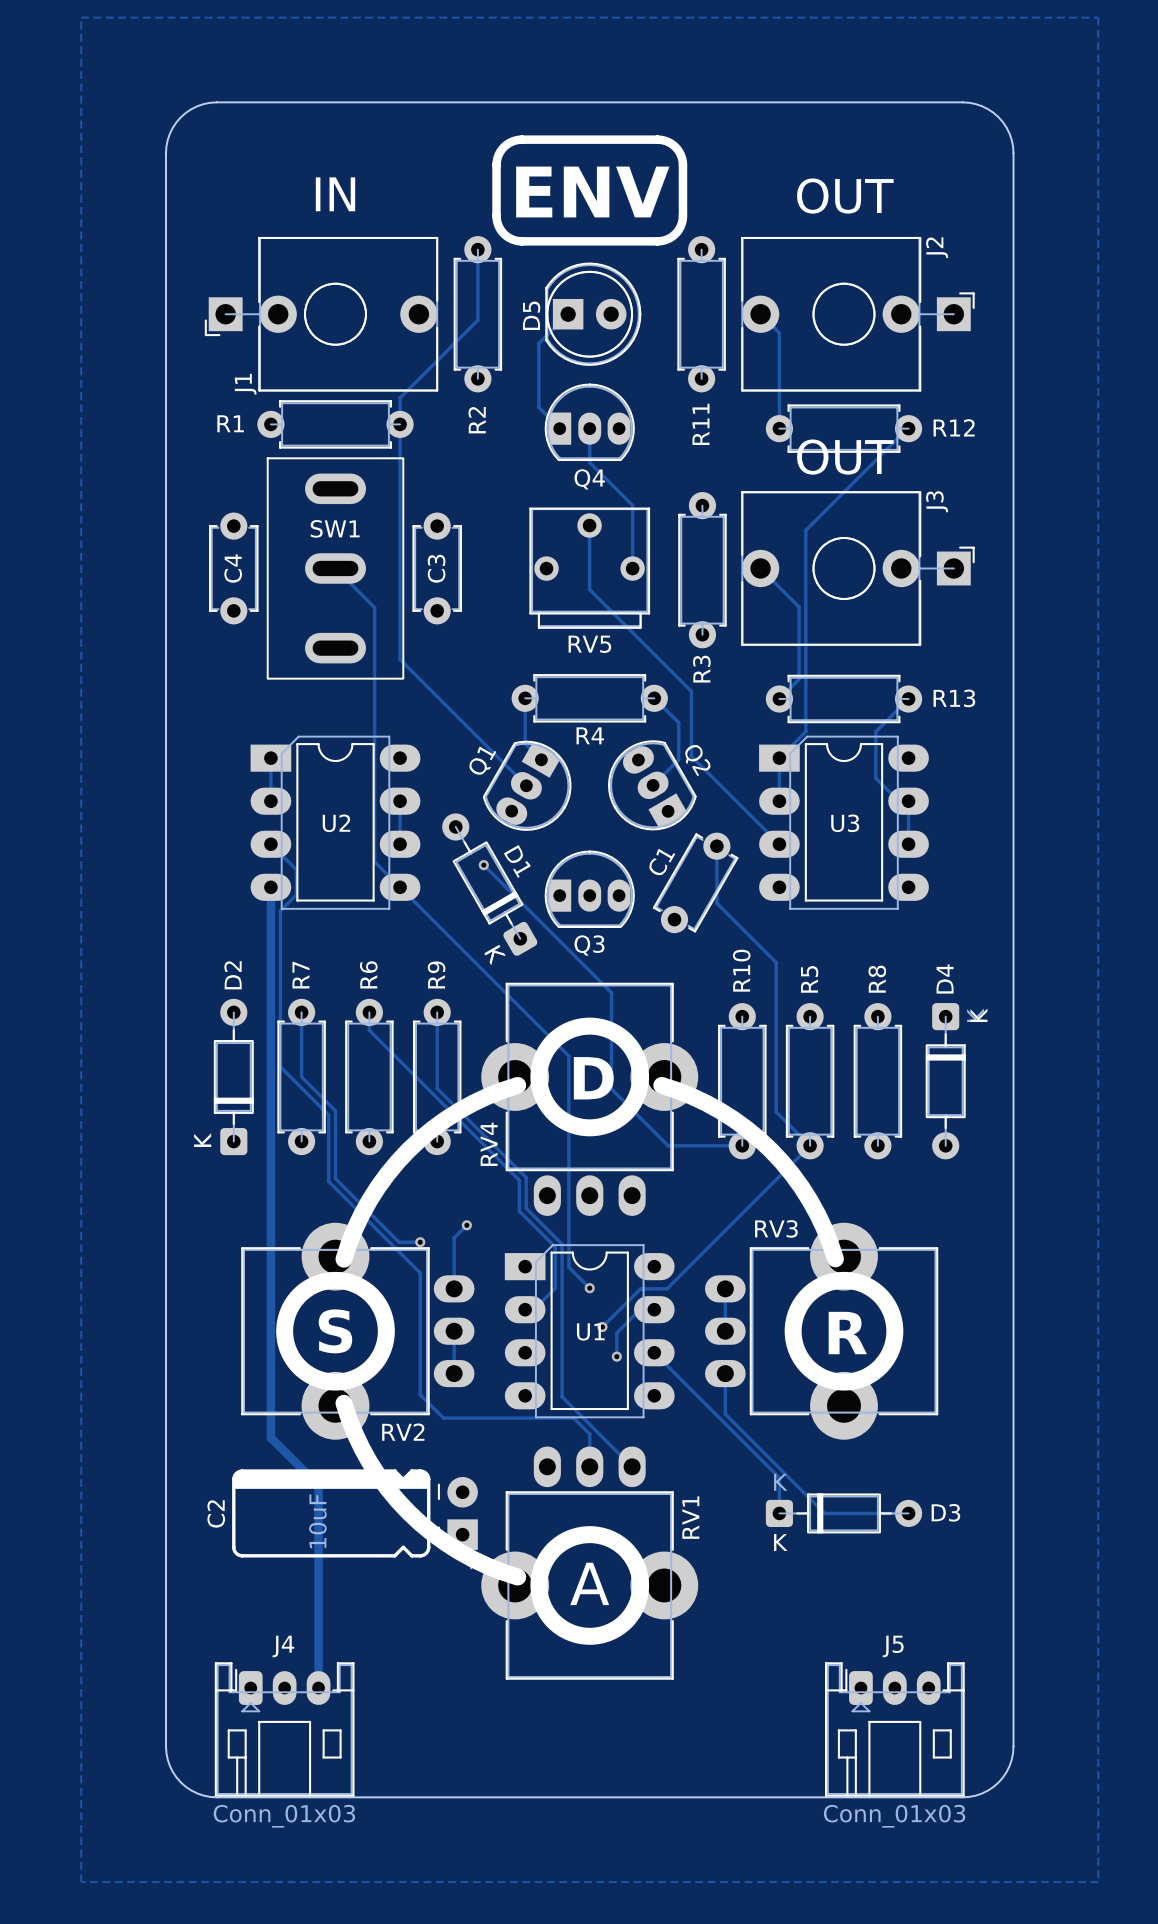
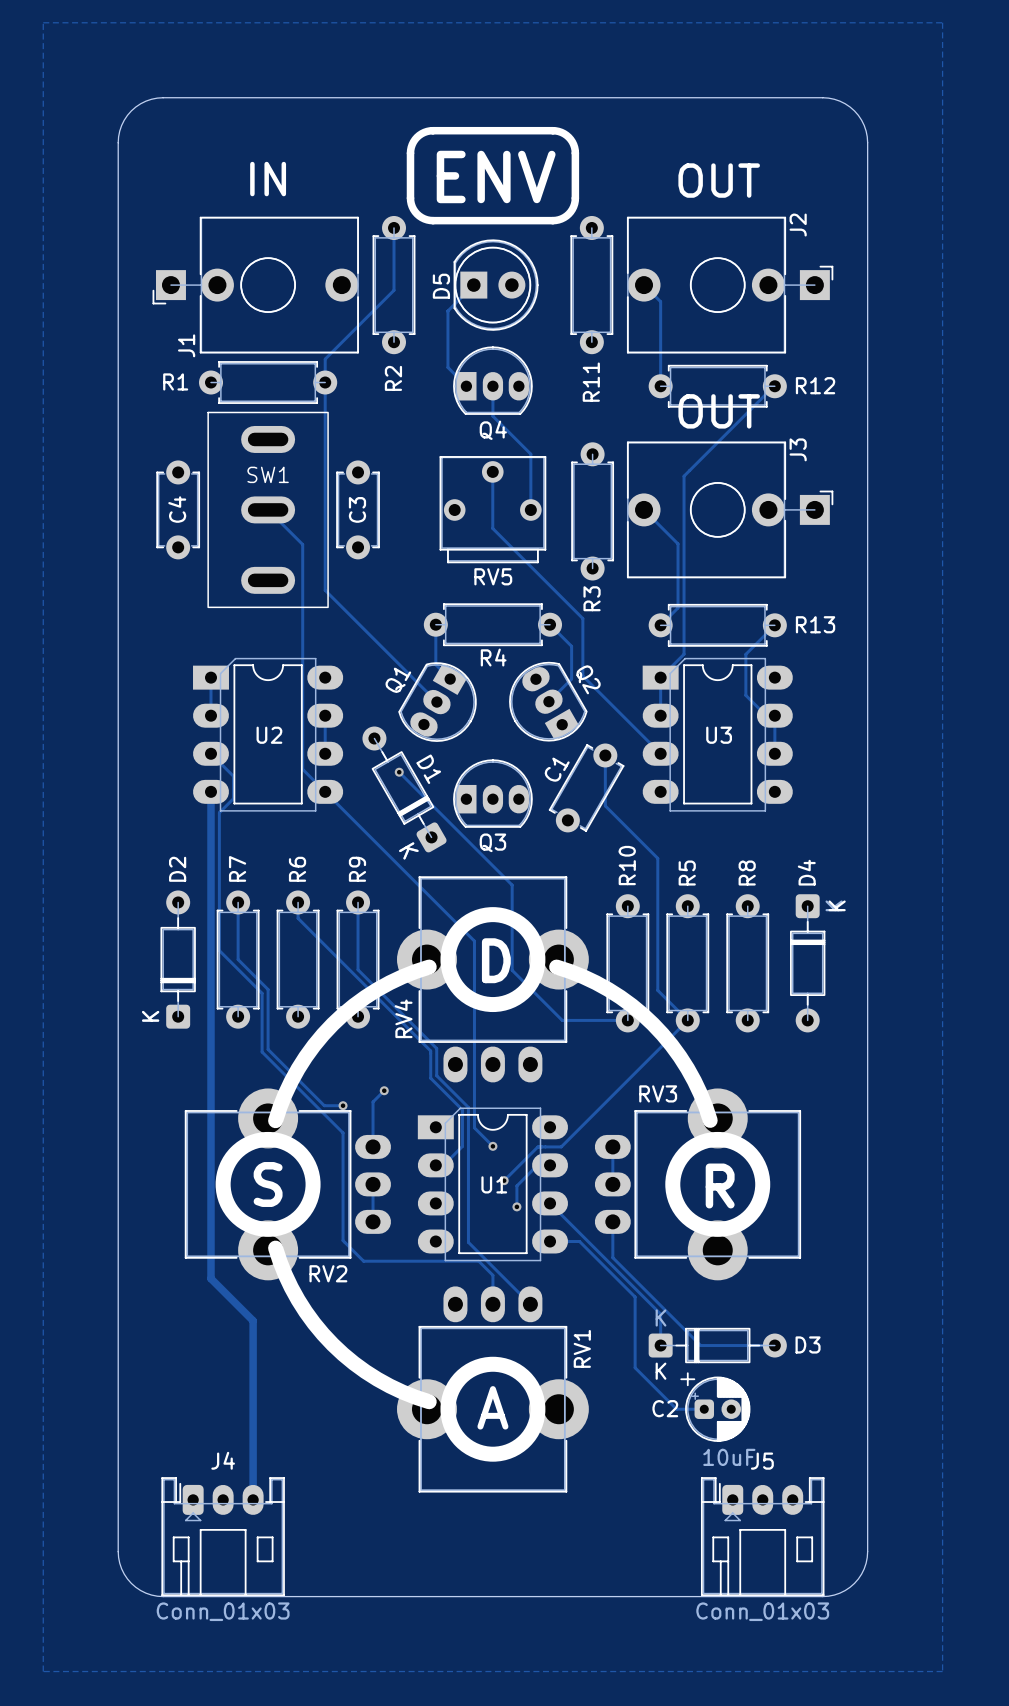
track: none -> (550, 1241) (579, 1241) (635, 1297) (635, 1367) (676, 1409) (706, 1409)
C2 footprint: [232, 1469, 481, 1570] -> [680, 1372, 751, 1442]
C2 name position: C2 (216, 1513) -> C2 (665, 1408)
C2 value position: 10uF (317, 1521) -> 10uF (729, 1457)

